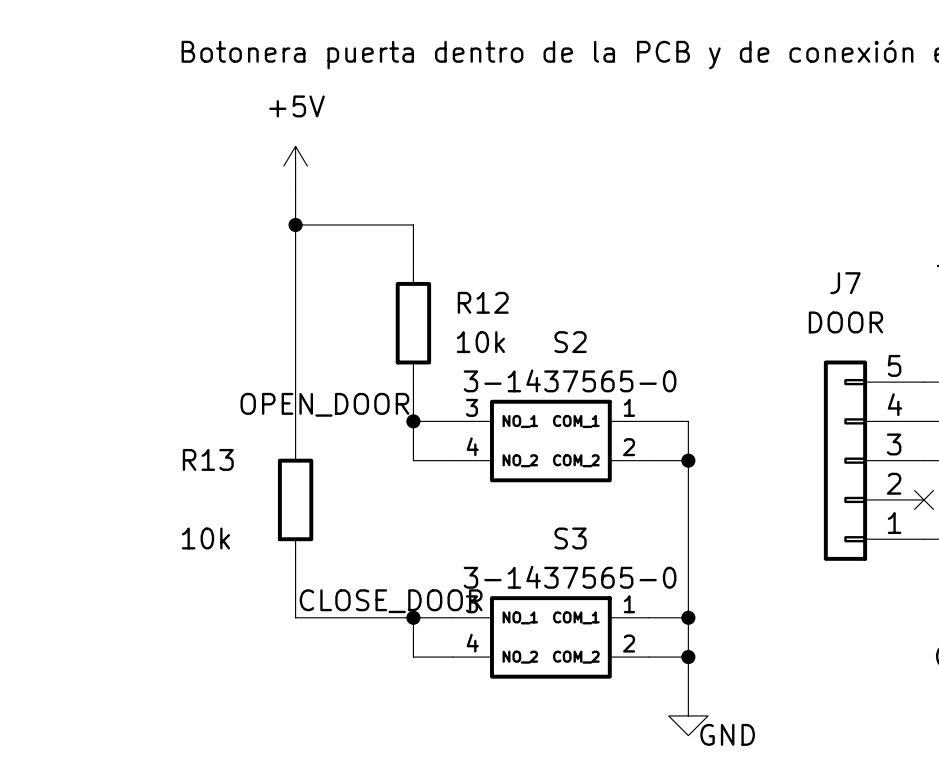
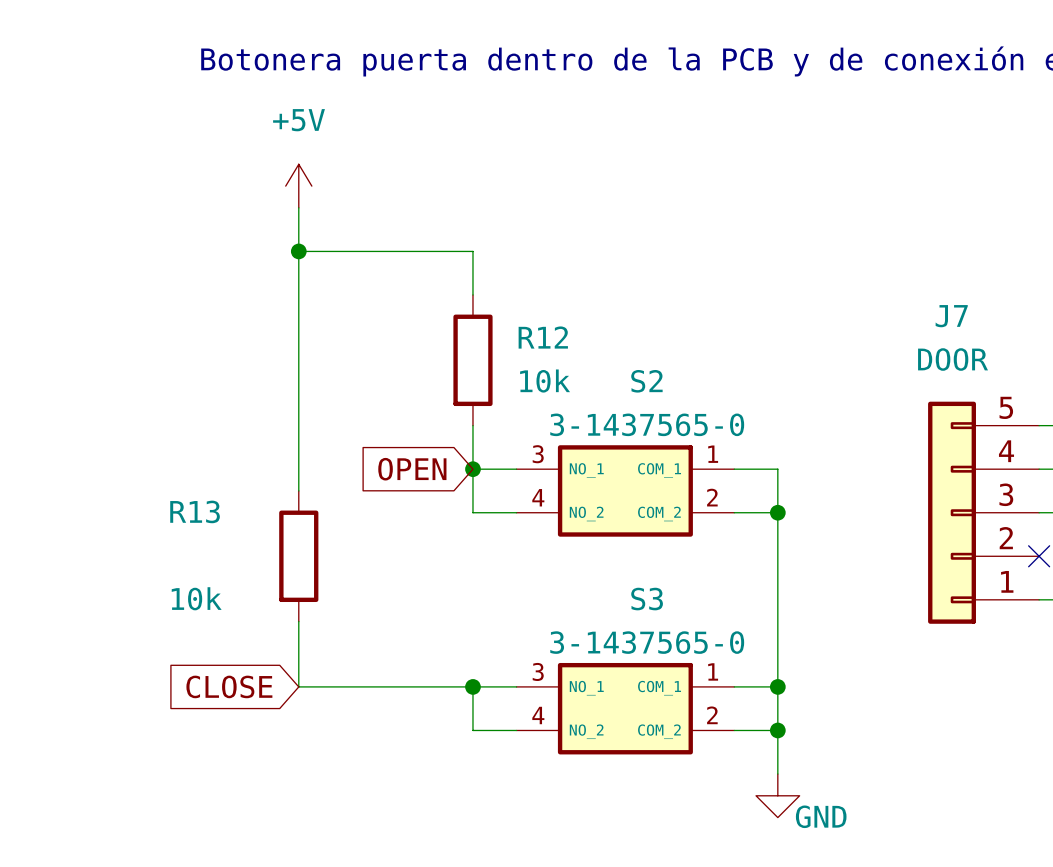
power symbol position: +5V (295, 166) -> +5V (298, 186)
wire: (295, 185) (295, 441) -> (298, 207) (298, 490)
wire: none -> (298, 251) (342, 251)
junction position: (295, 225) -> (298, 251)
label: OPEN_DOOR (324, 404) -> none
global label: none -> OPEN (412, 469)
R13 position: (295, 499) -> (298, 556)
wire: (295, 558) (295, 617) -> (298, 621) (298, 686) (342, 686)
label: CLOSE_DOOR (391, 601) -> none
global label: none -> CLOSE (229, 686)

